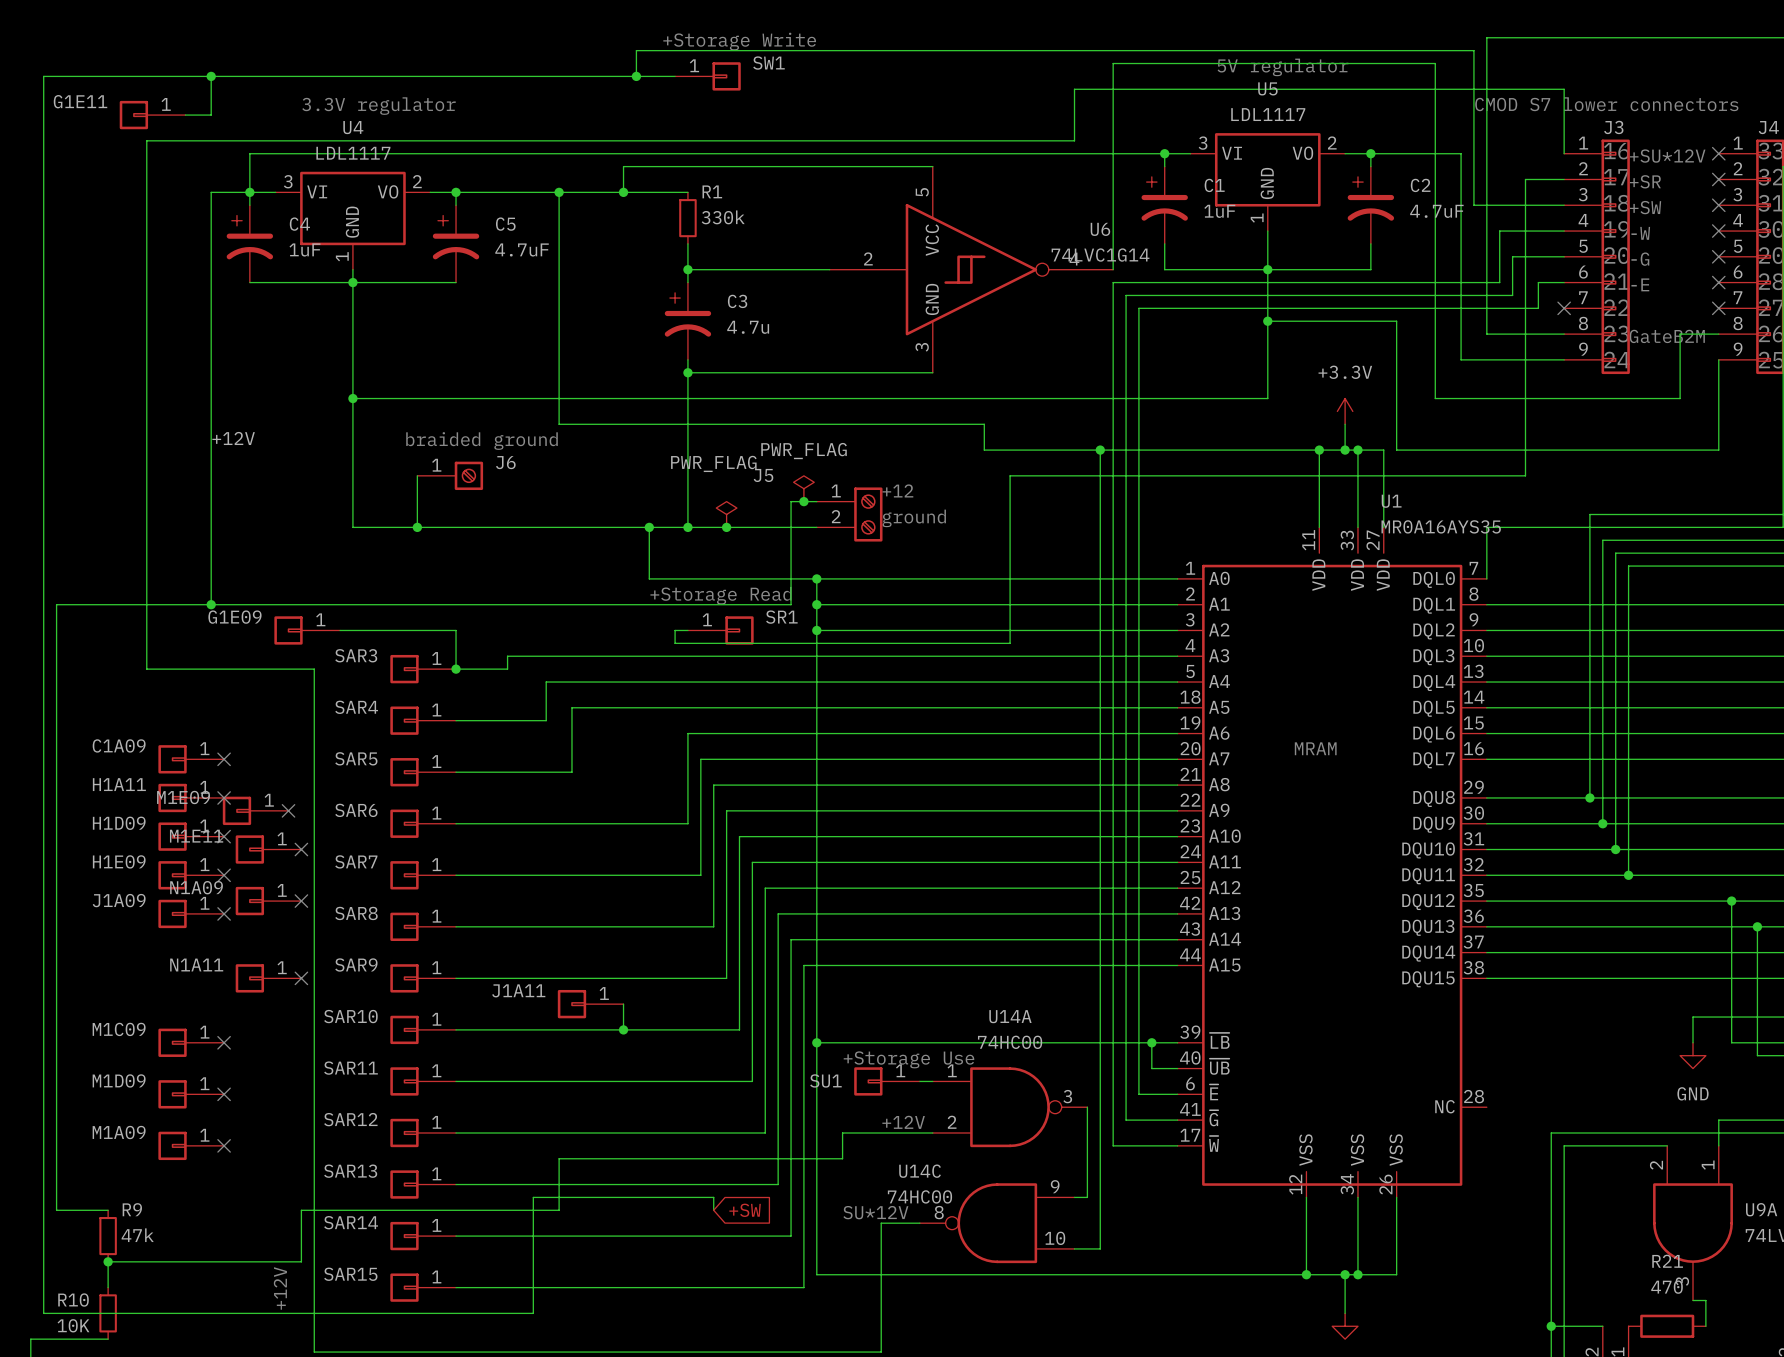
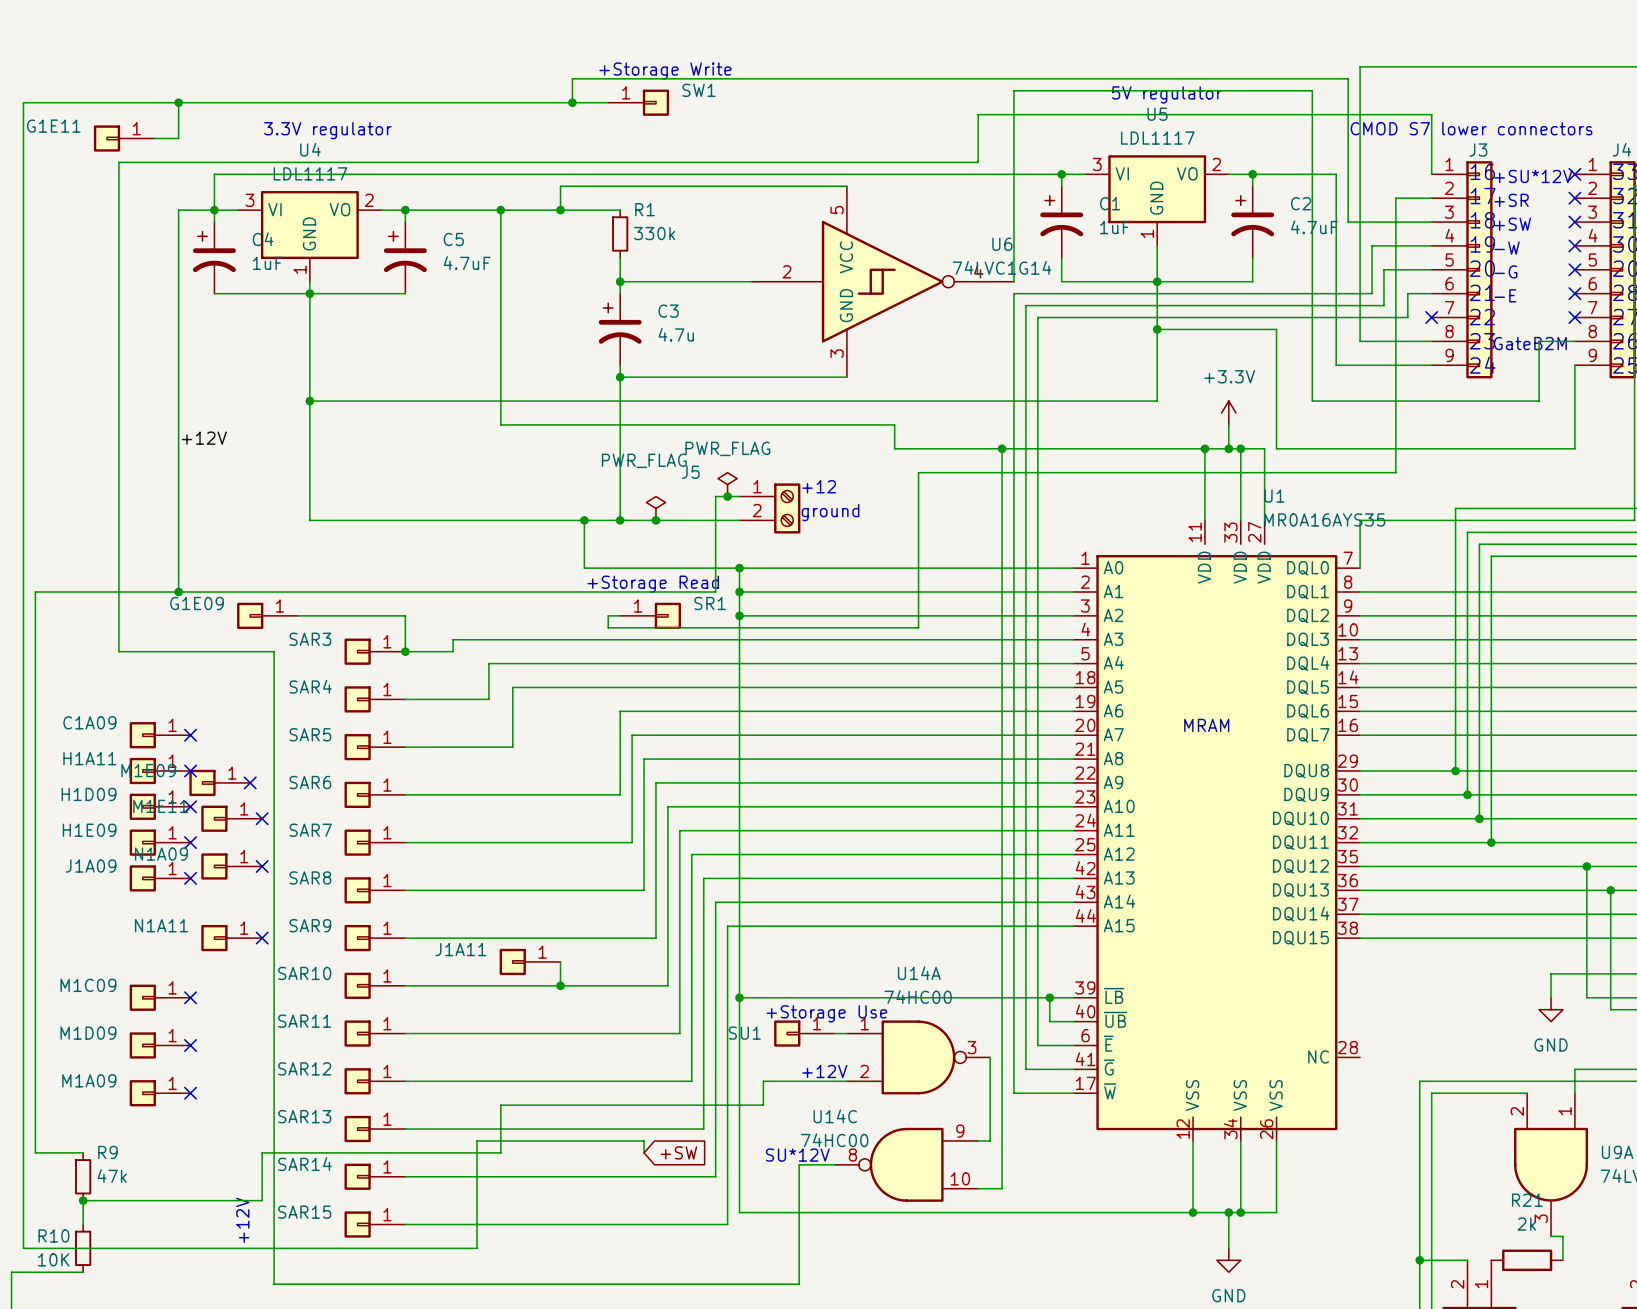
text: braided ground (482, 441) -> none
wire: (417, 475) (417, 527) -> none
J6: (450, 475) -> none
junction: (417, 527) -> none
R21 value: 470 (1667, 1287) -> 2k (1526, 1224)

